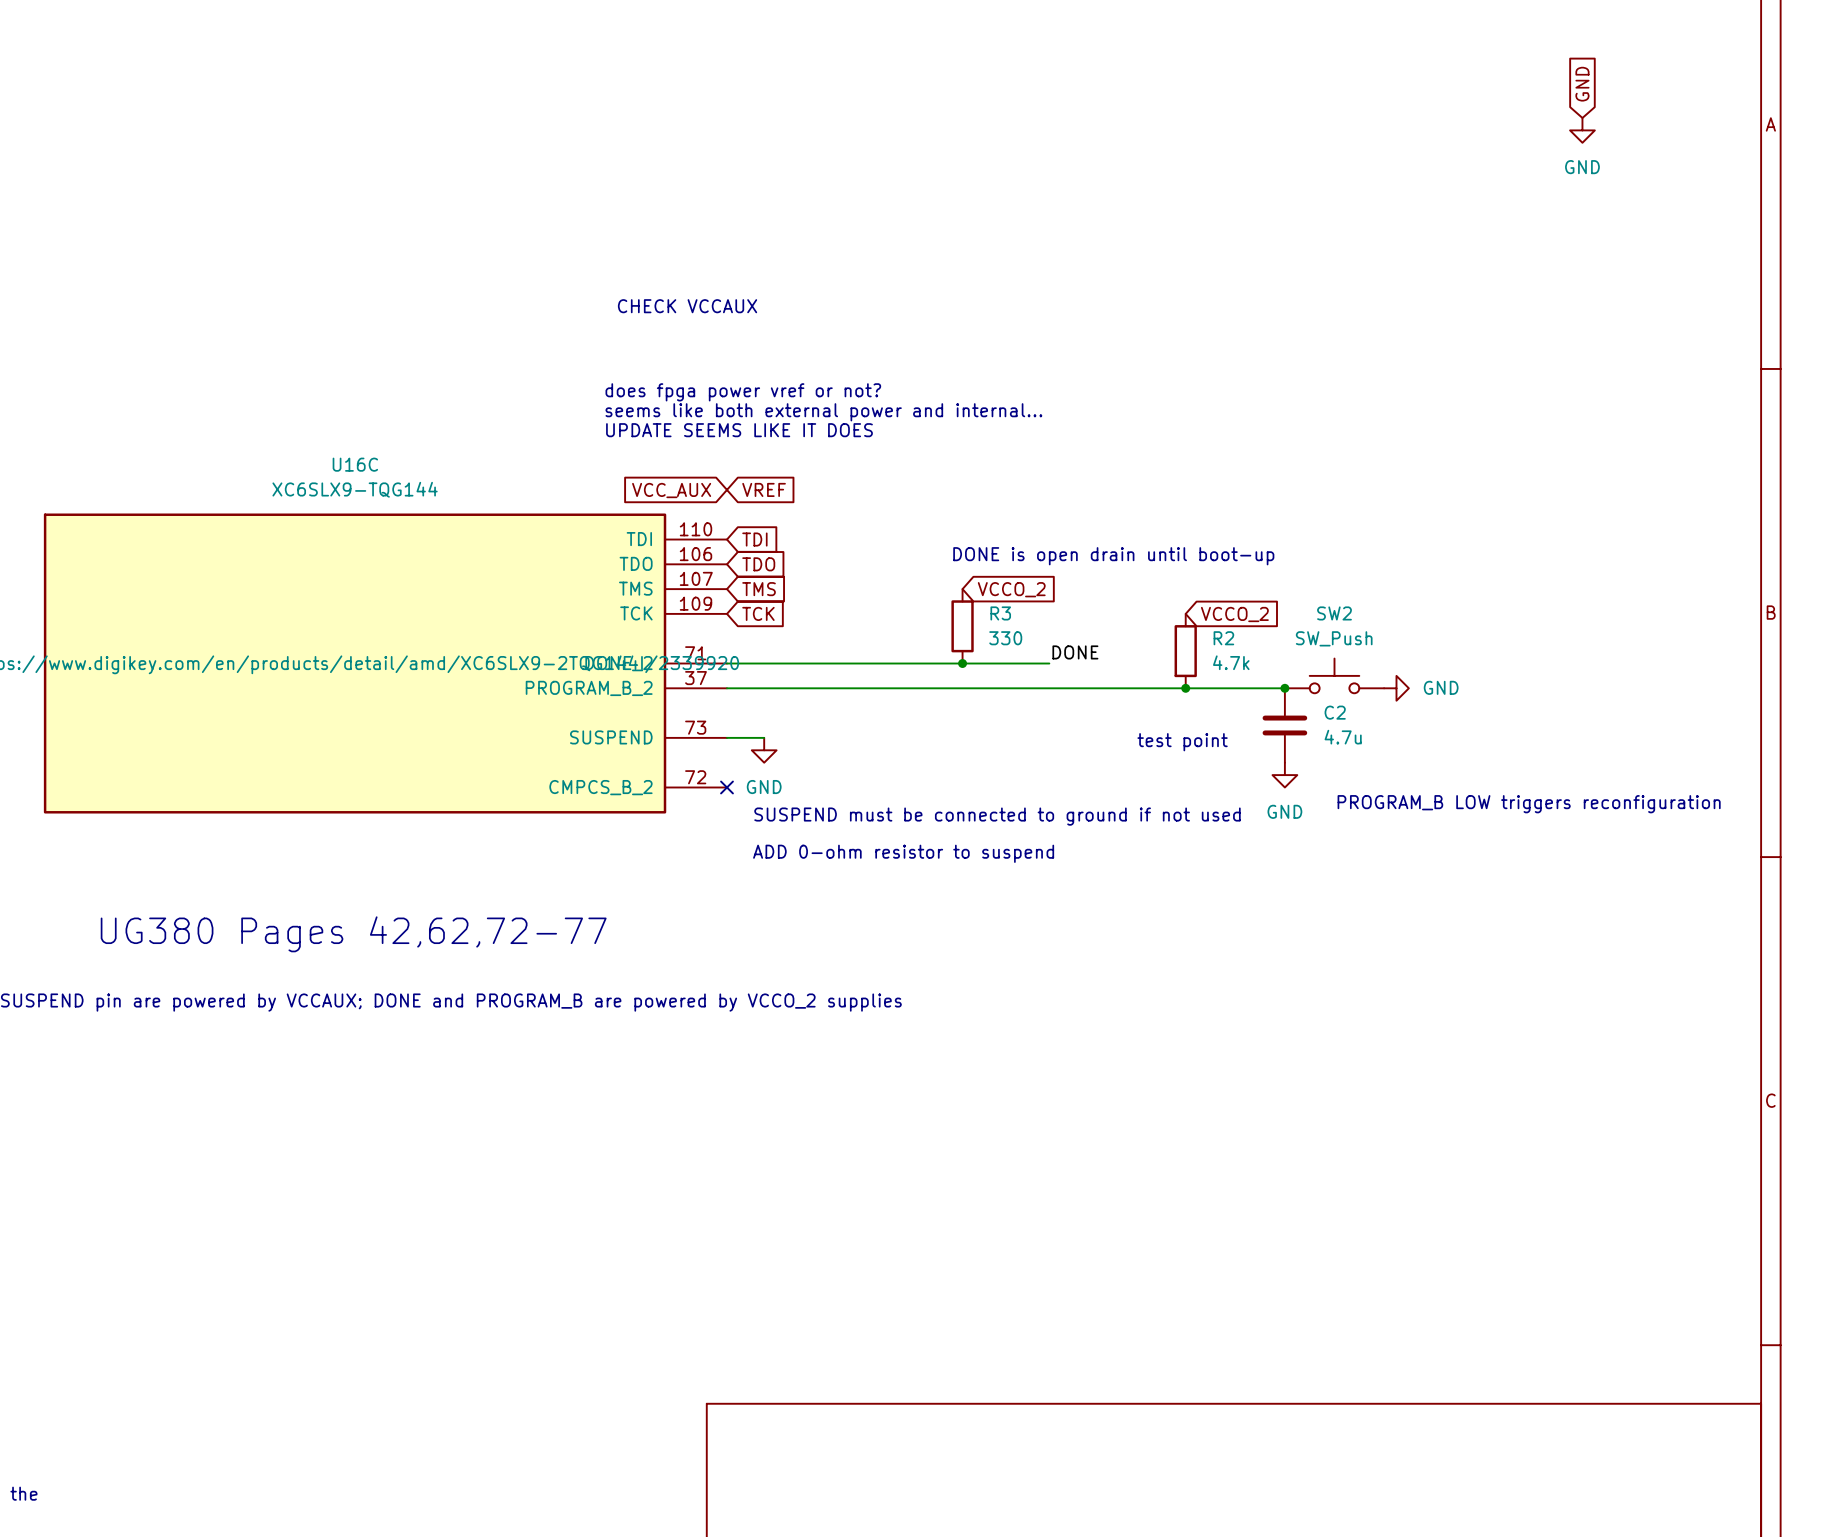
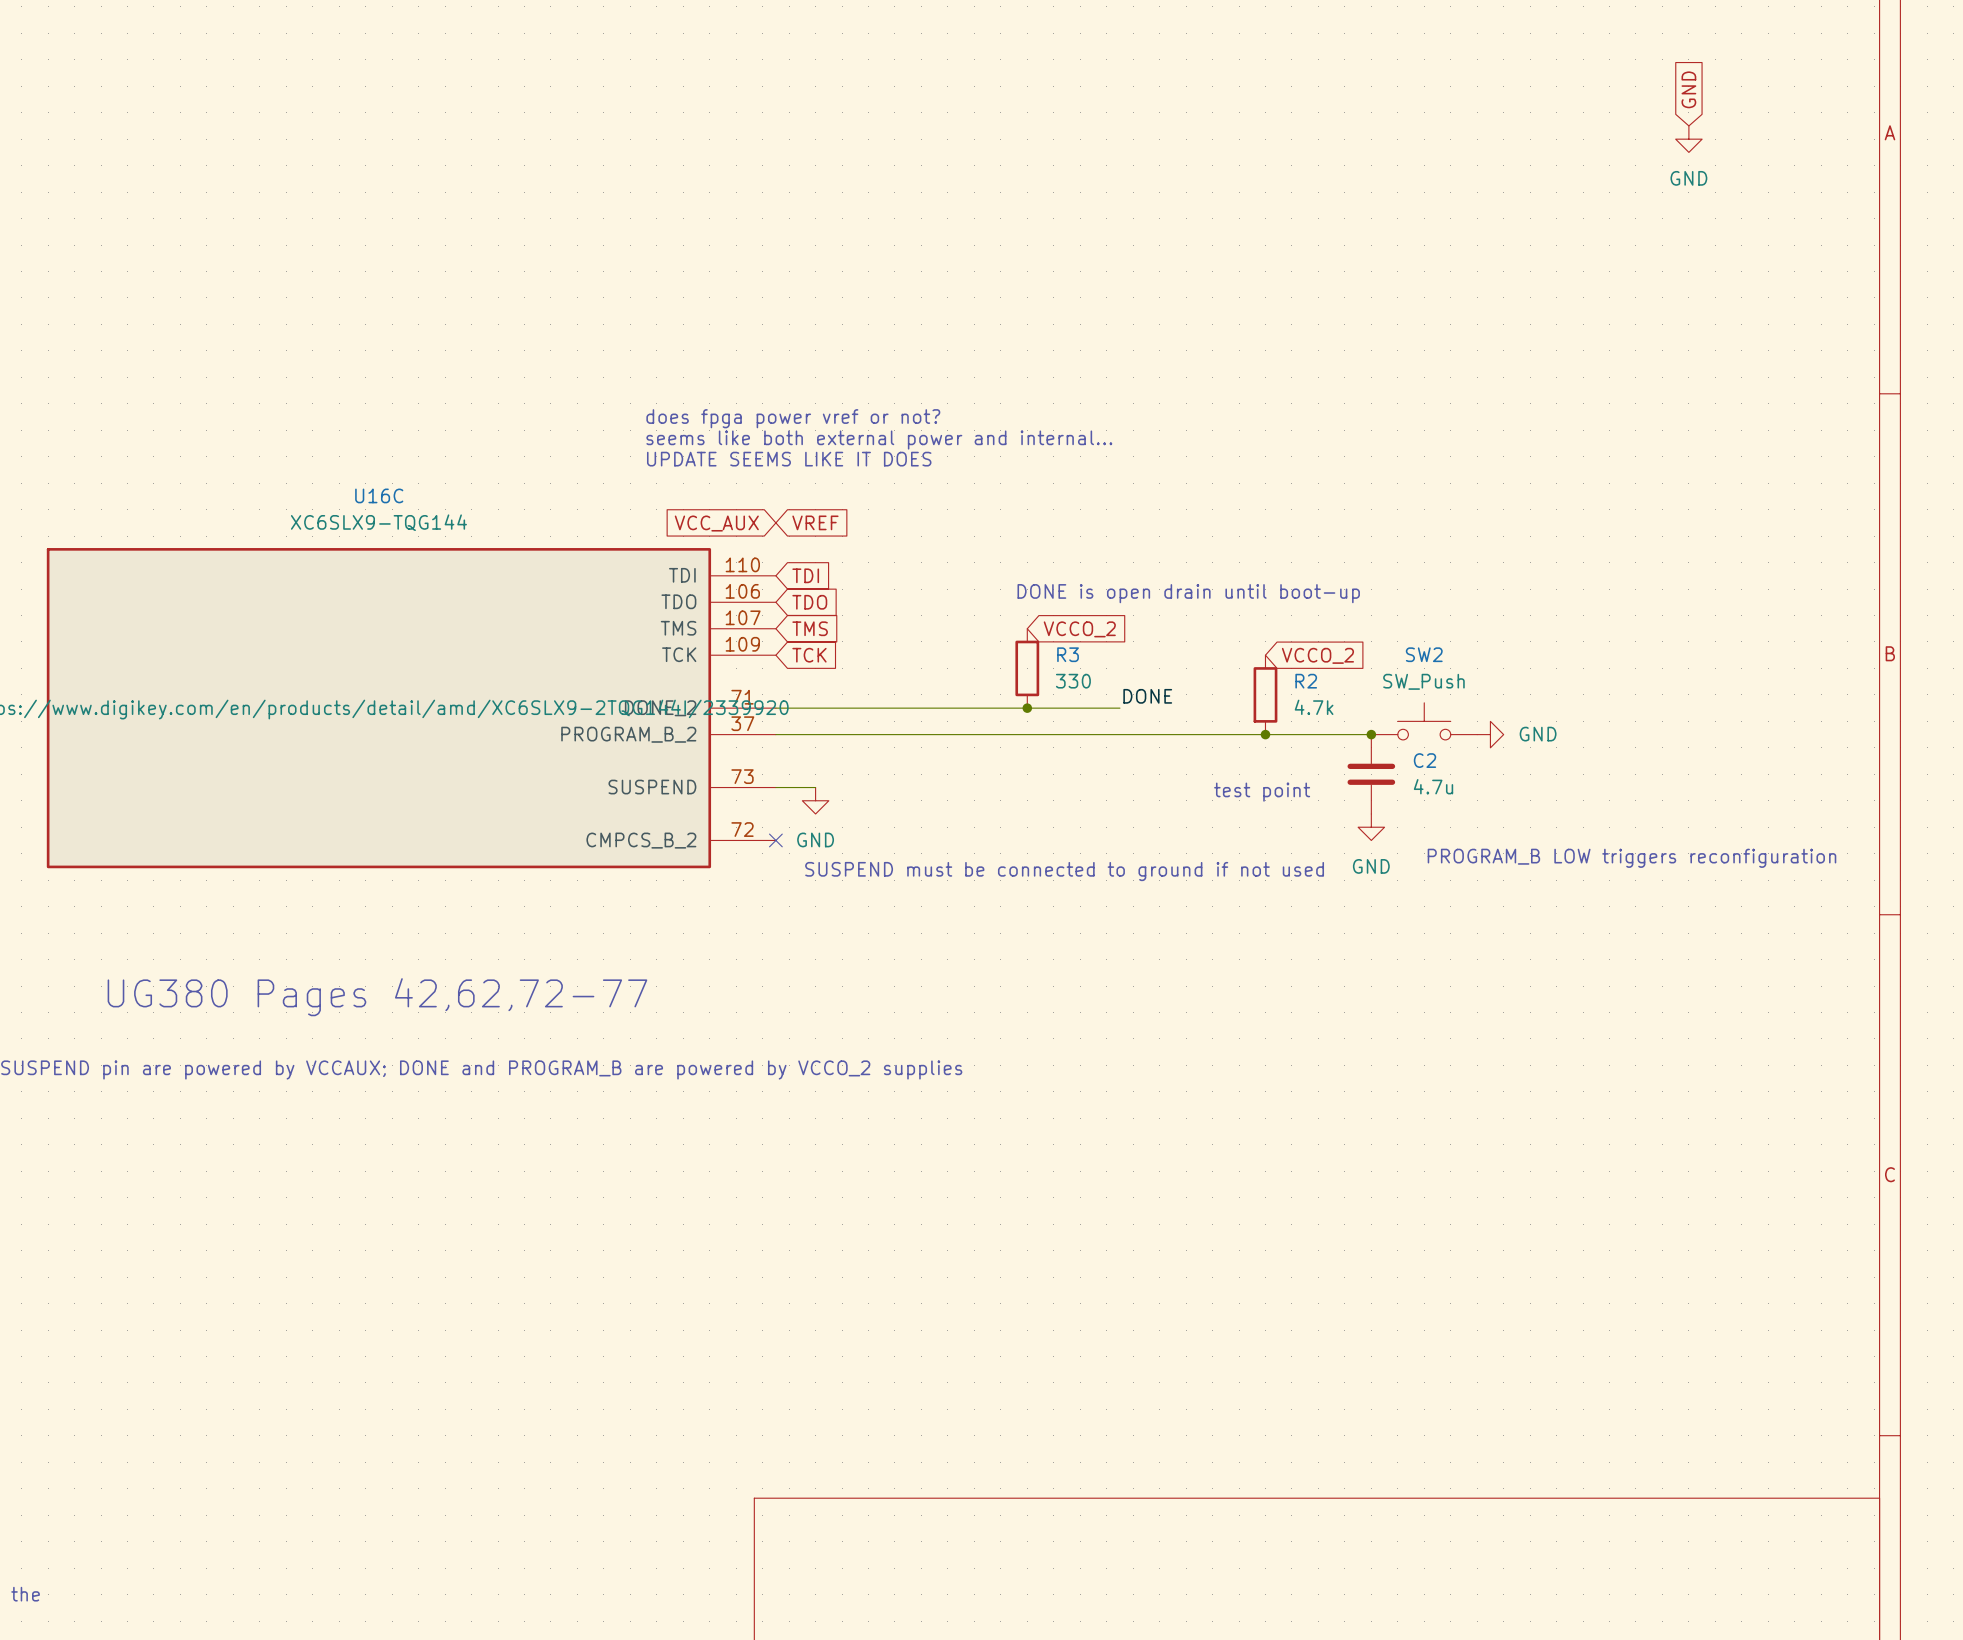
text: CHECK VCCAUX (687, 306) -> none
text: ADD 0-ohm resistor to suspend (903, 853) -> none

